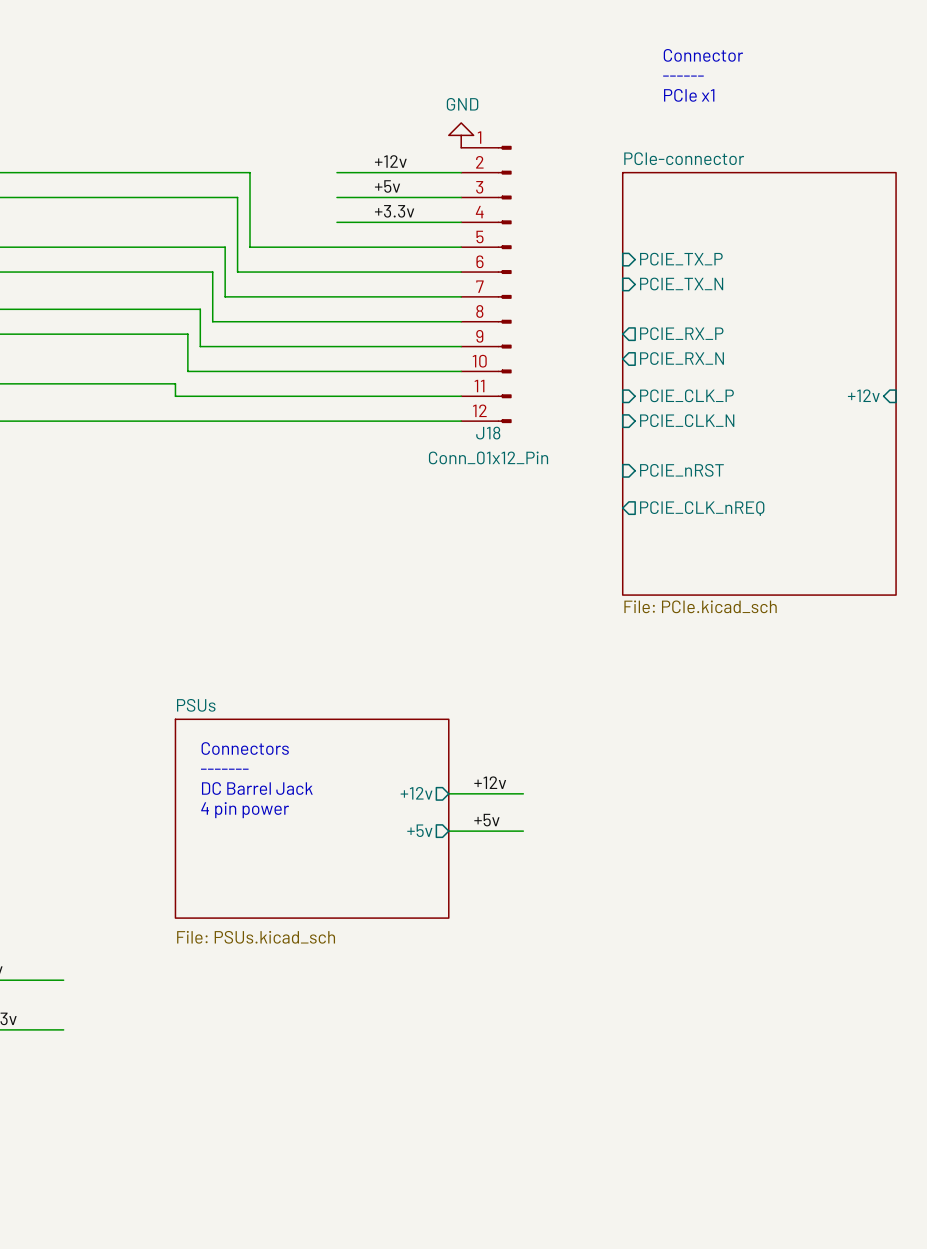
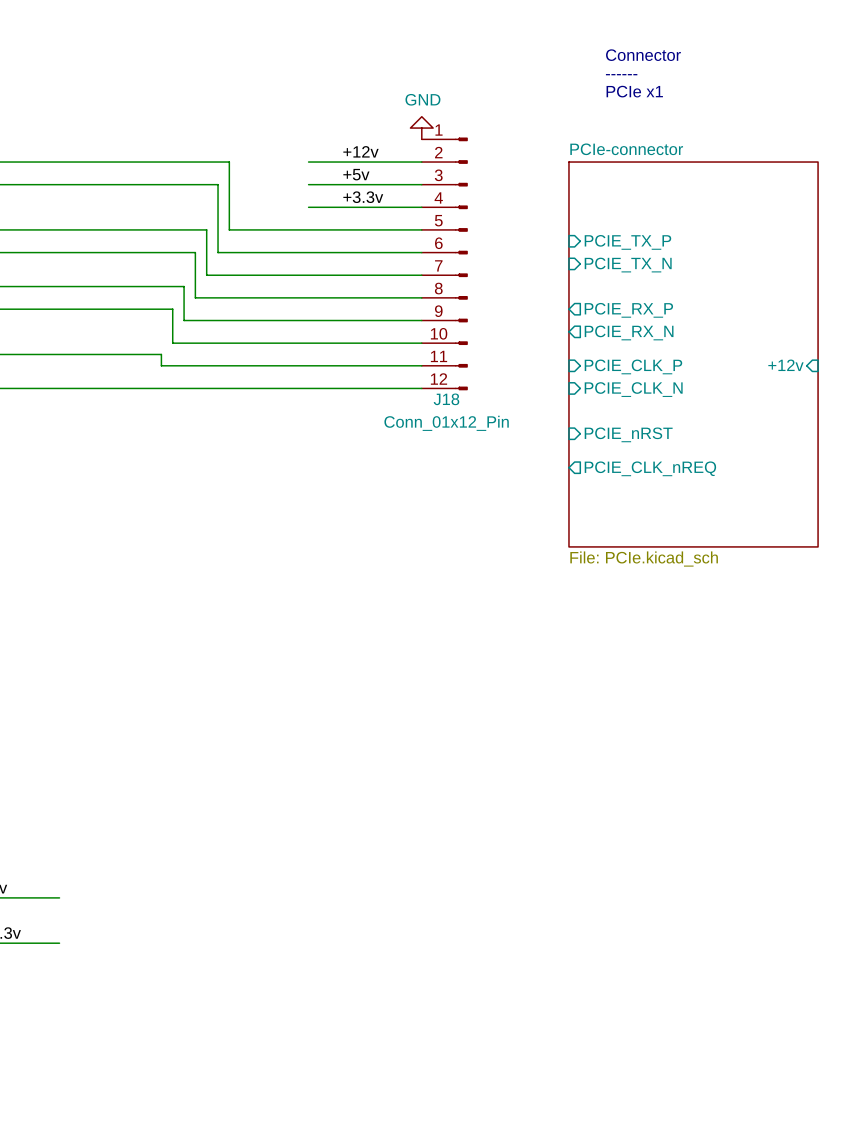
text: Connectors (245, 748) -> none
text: ------- (224, 769) -> none
label: +12v (490, 782) -> none
text: DC Barrel Jack (257, 788) -> none
sheet pin: +12v (416, 793) -> none
wire: (448, 793) (523, 793) -> none
text: 4 pin power (245, 810) -> none
sheet PSUs: File: PSUs.kicad_sch (312, 818) -> none
label: +5v (486, 820) -> none
sheet pin: +5v (419, 830) -> none
wire: (448, 831) (523, 831) -> none

